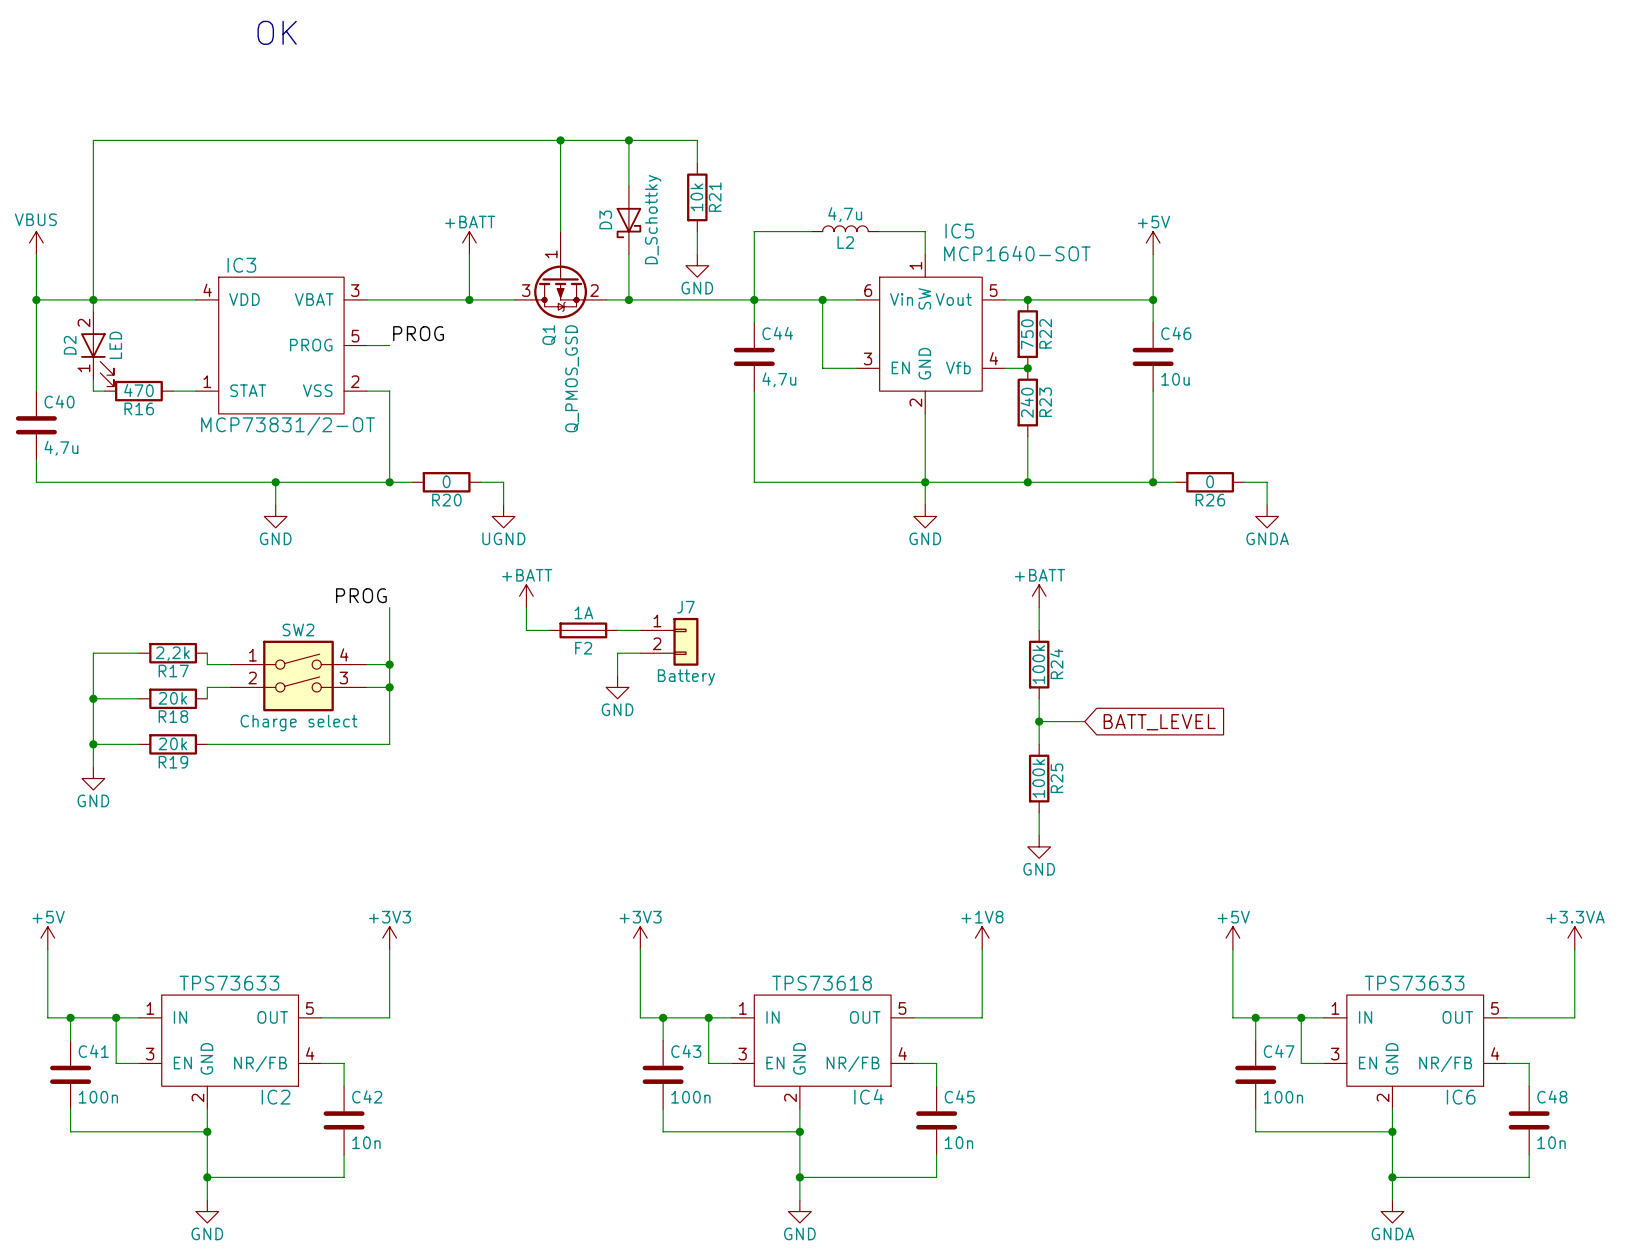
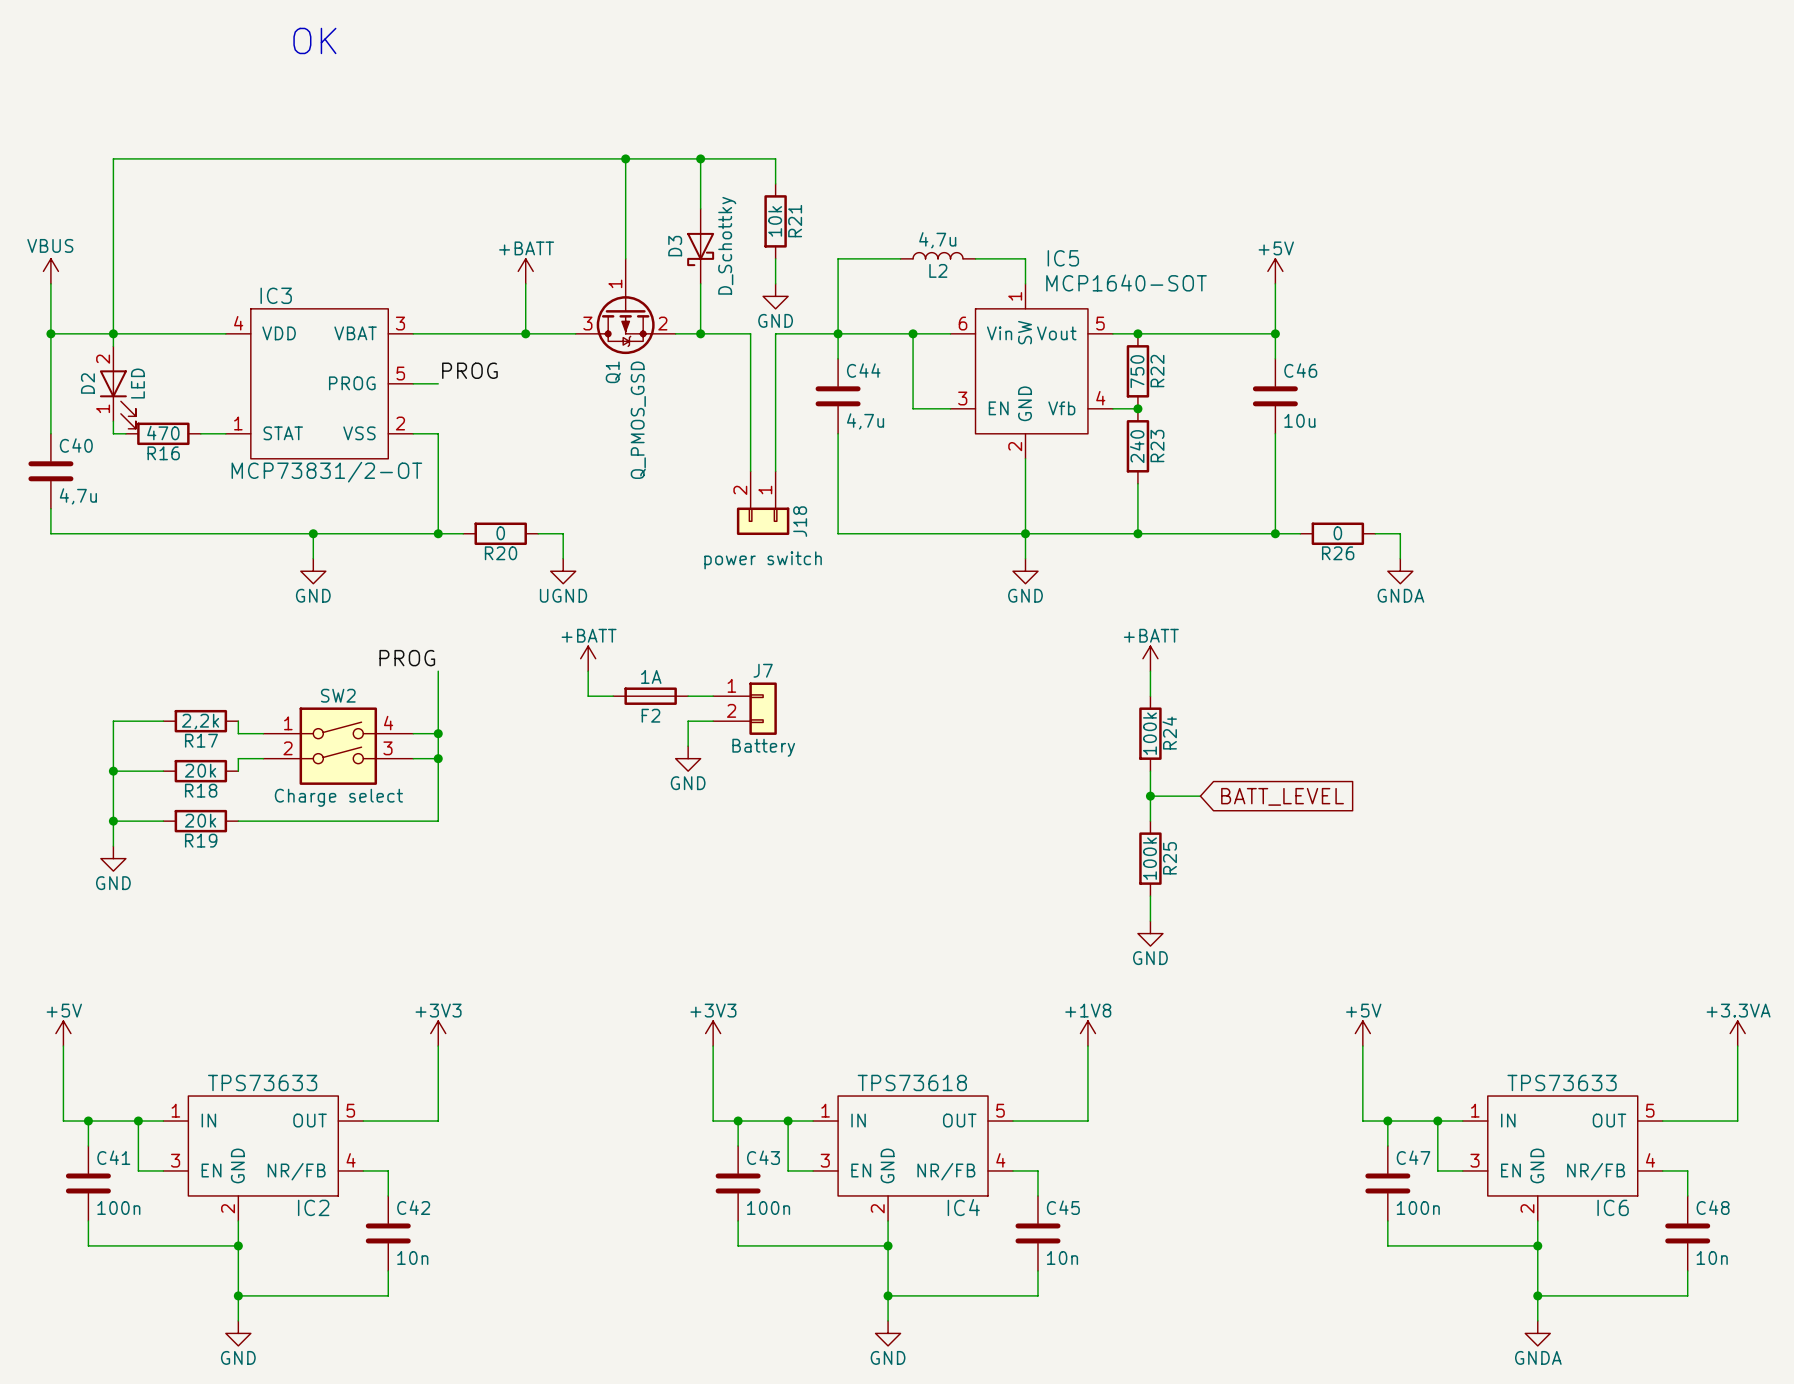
wire: (674, 299) (697, 299) -> (750, 333) (750, 471)
wire: none -> (775, 333) (775, 471)
J18: none -> power switch (763, 503)

